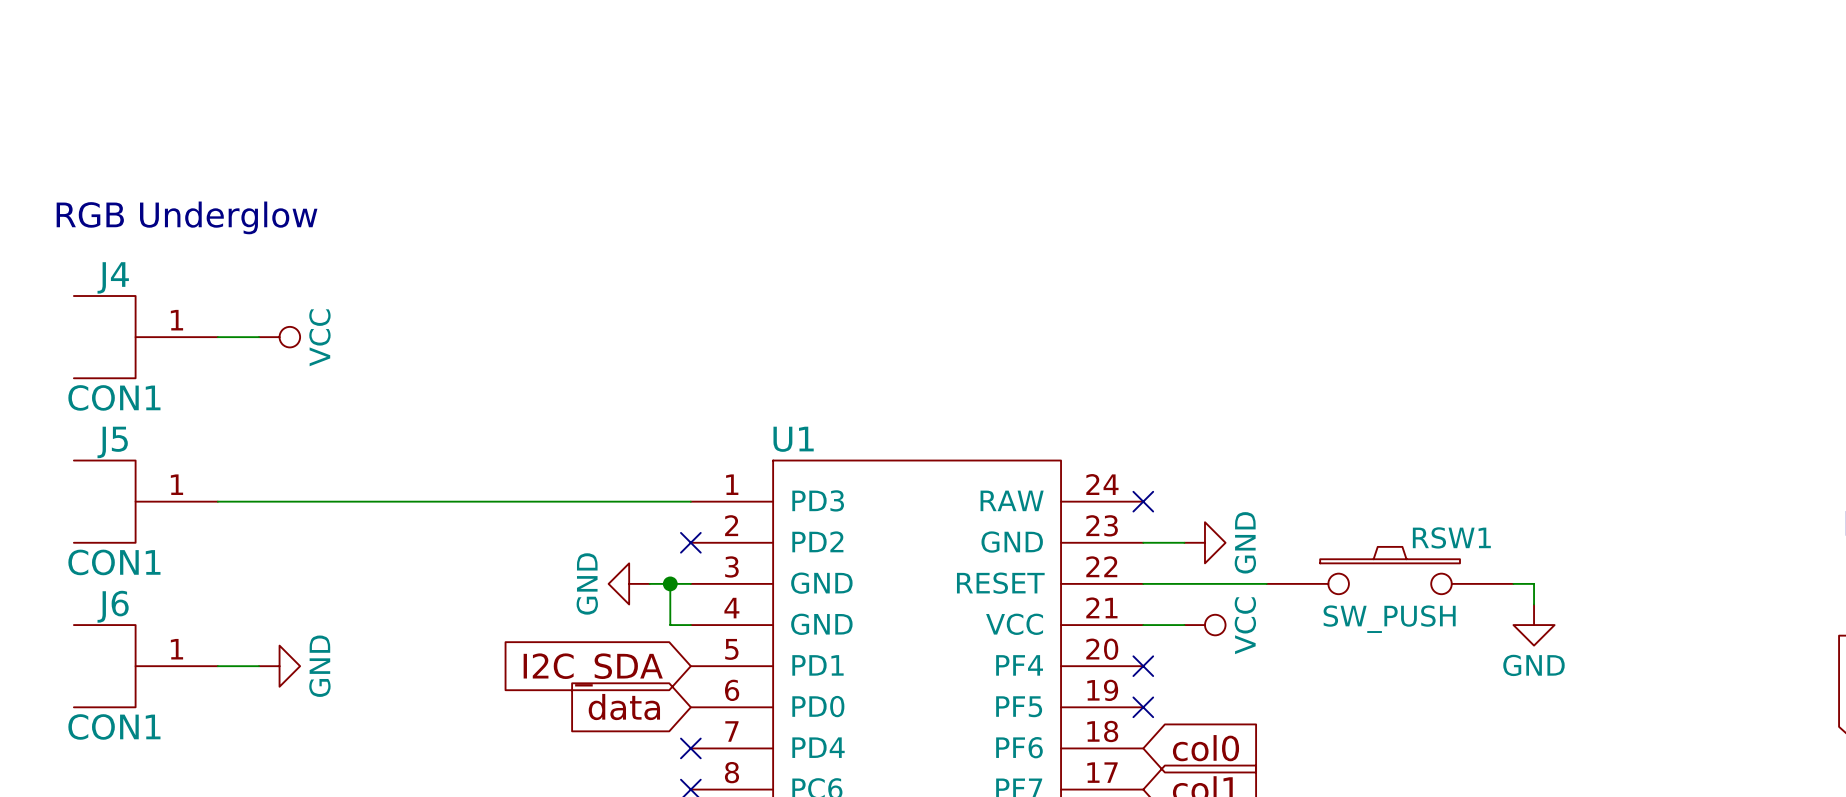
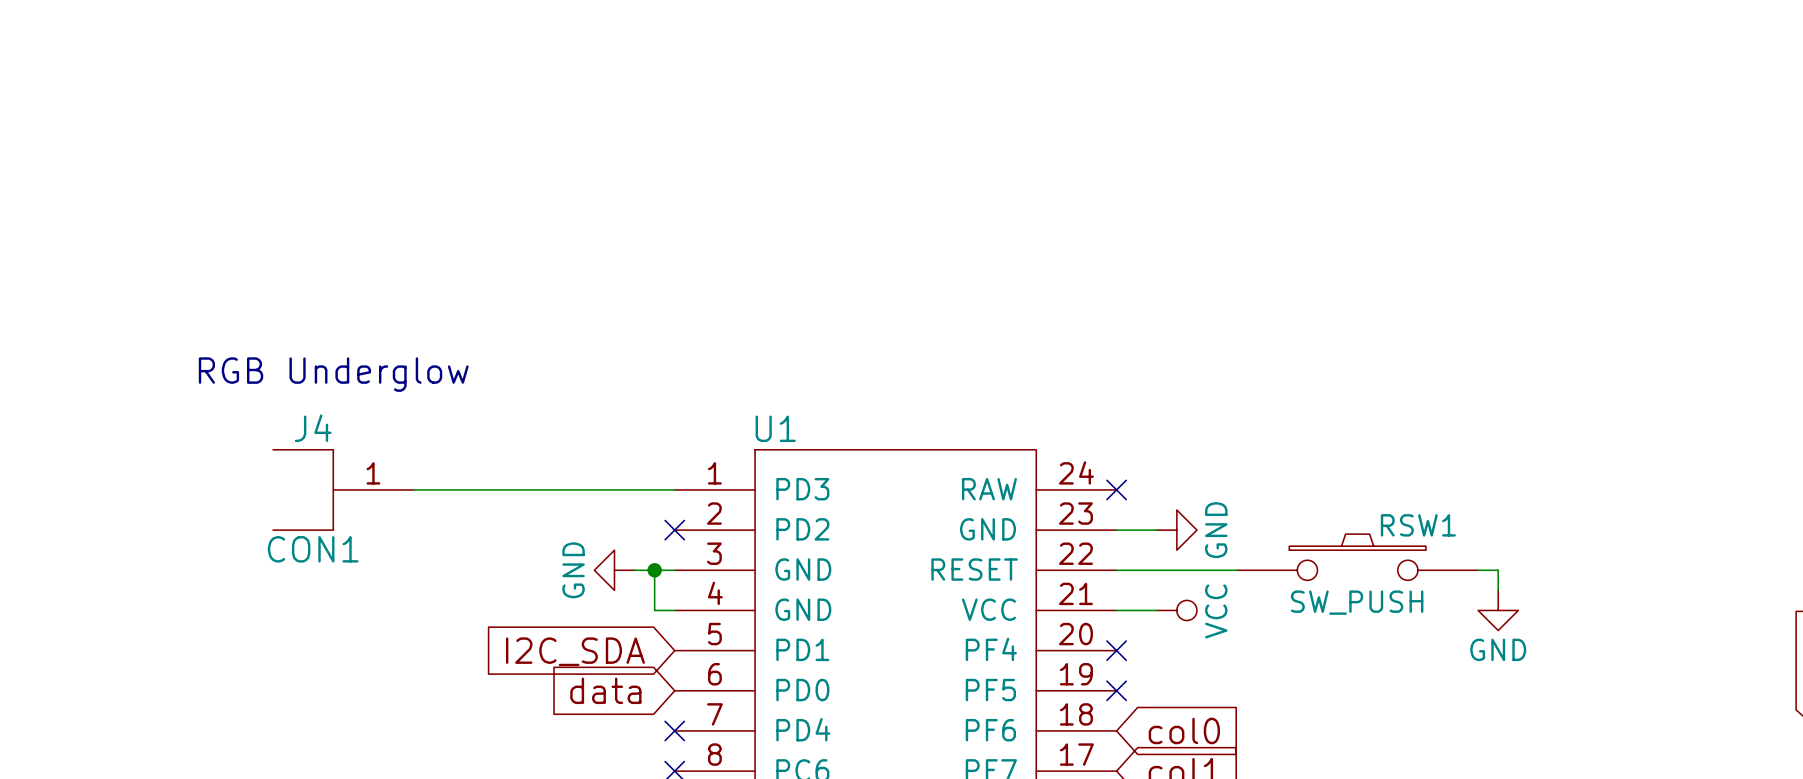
text position: RGB Underglow (187, 217) -> RGB Underglow (333, 374)
J4 position: (145, 337) -> (343, 489)
wire: (217, 337) (258, 337) -> none
power symbol: VCC (279, 337) -> none
J5: CON1 (145, 501) -> none
wire: (217, 501) (423, 501) -> none
J6: CON1 (145, 666) -> none
wire: (217, 666) (258, 666) -> none
power symbol: GND (279, 666) -> none

